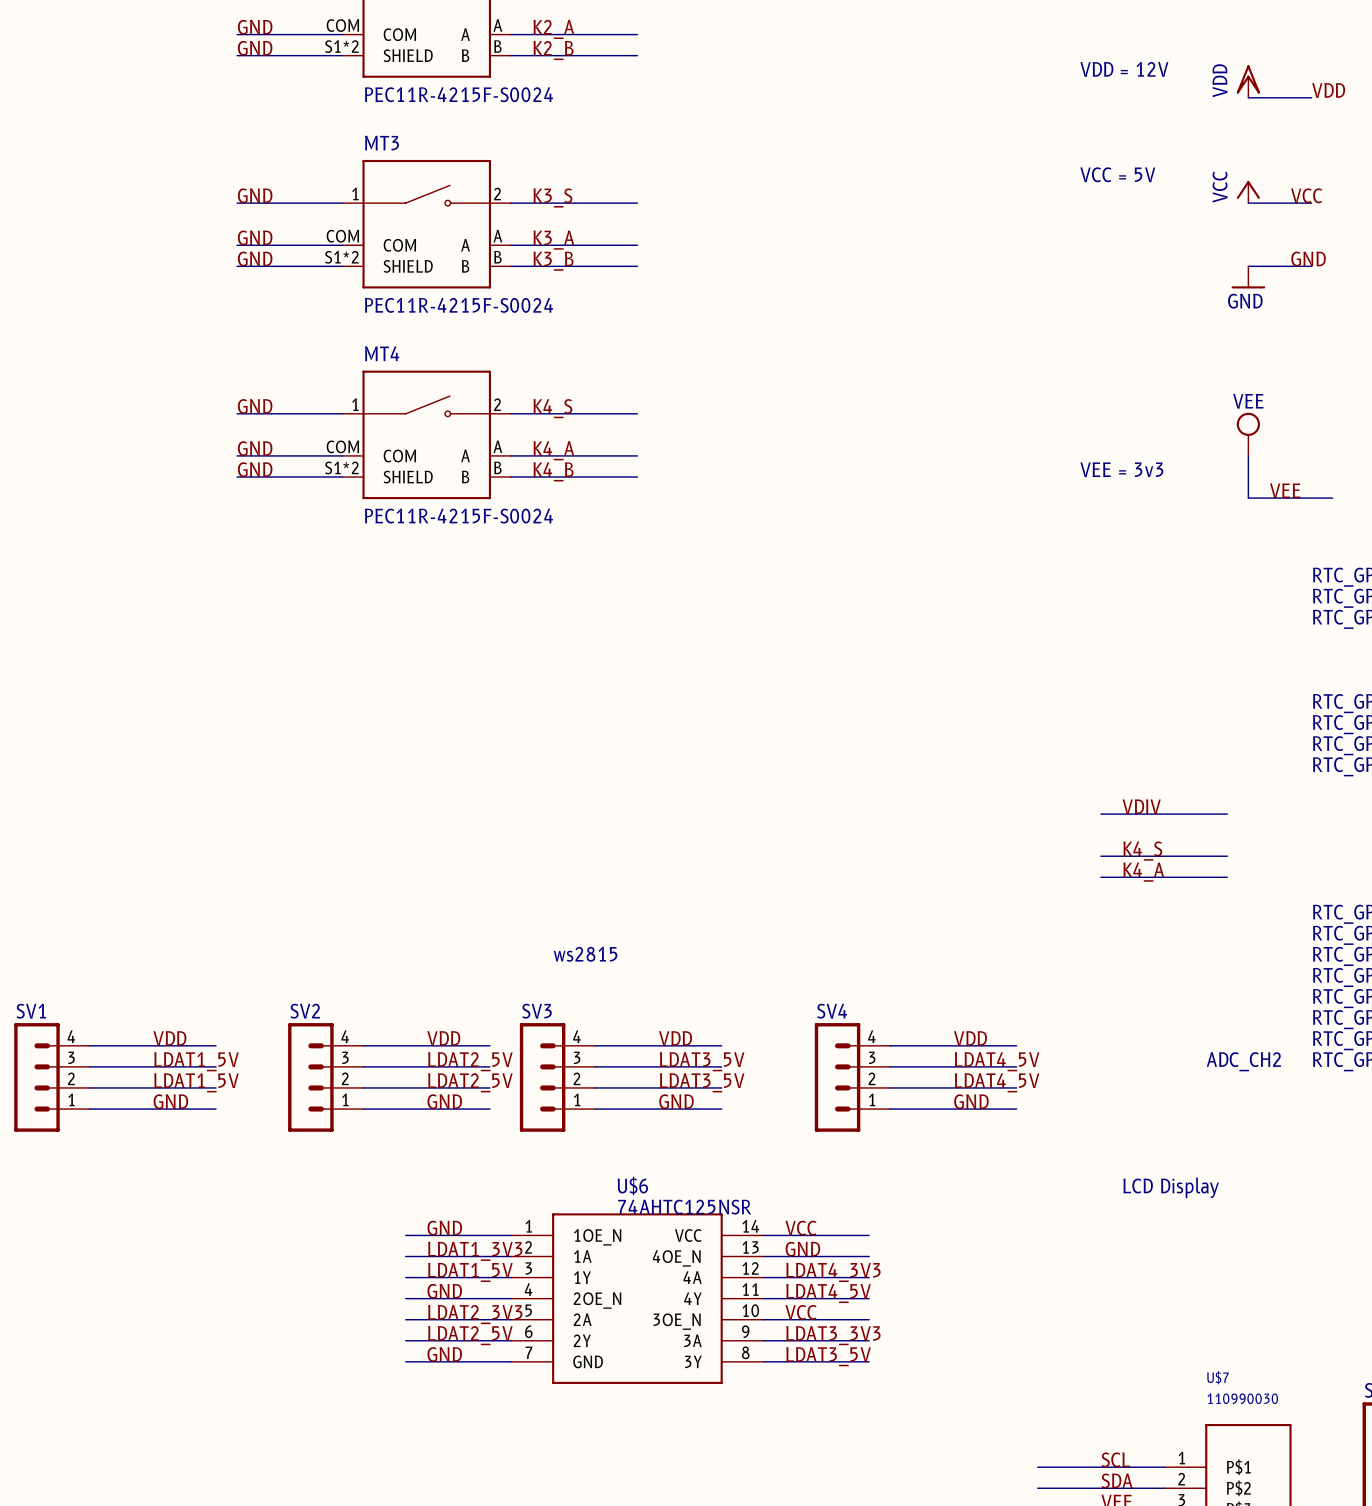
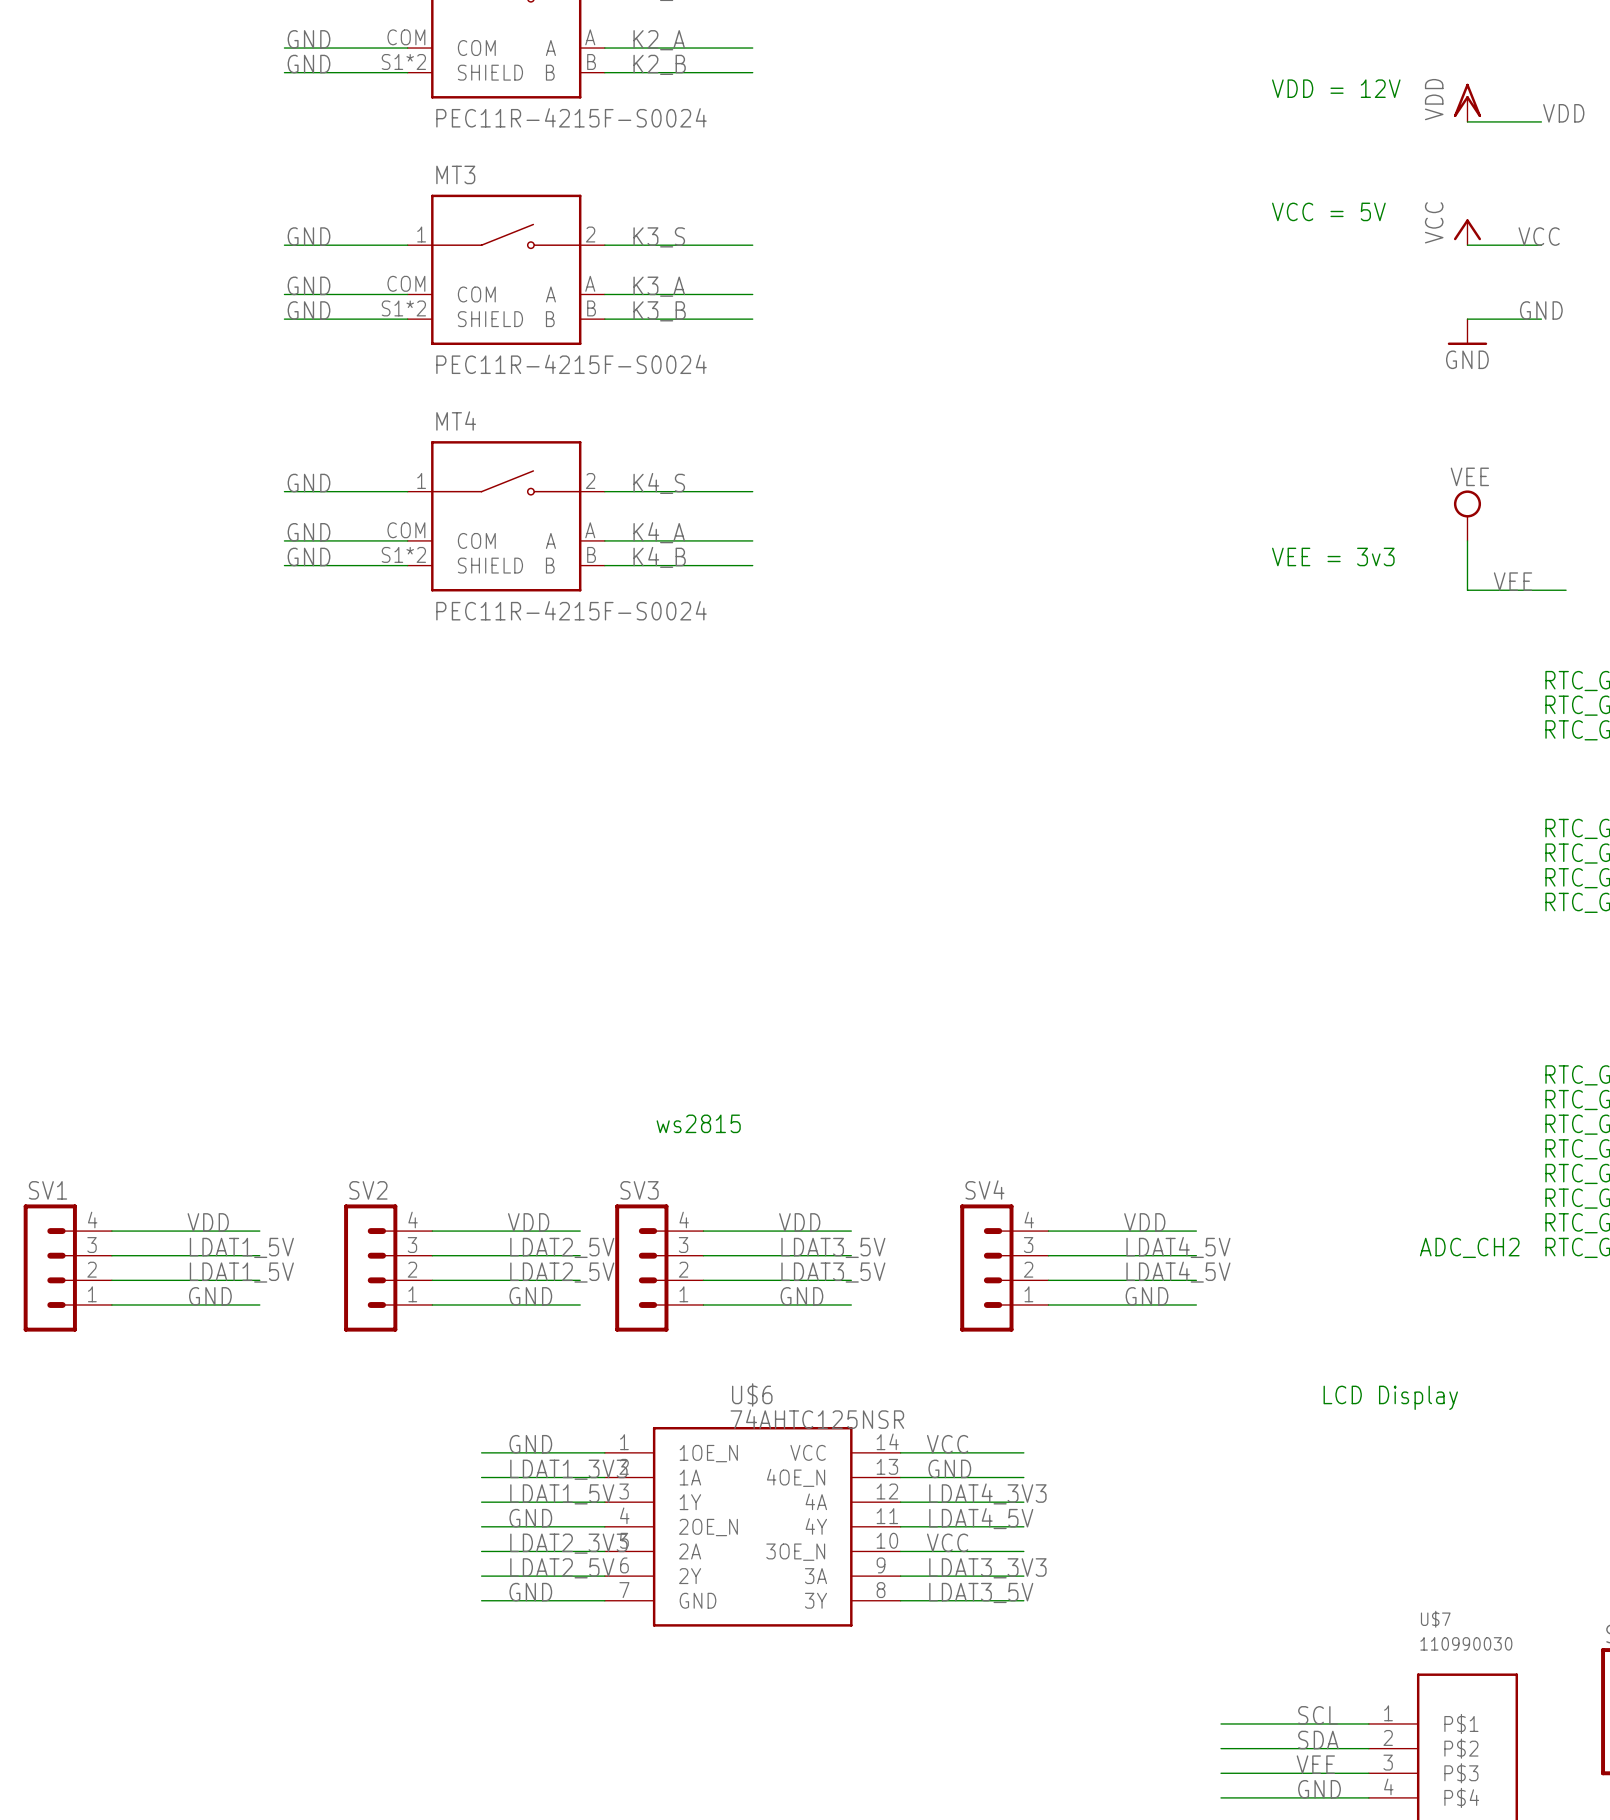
label: VDIV (1141, 806) -> none
wire: (1100, 814) (1227, 814) -> none
label: K4_S (1142, 851) -> none
wire: (1100, 856) (1227, 856) -> none
label: K4_A (1143, 872) -> none
wire: (1100, 877) (1227, 877) -> none

